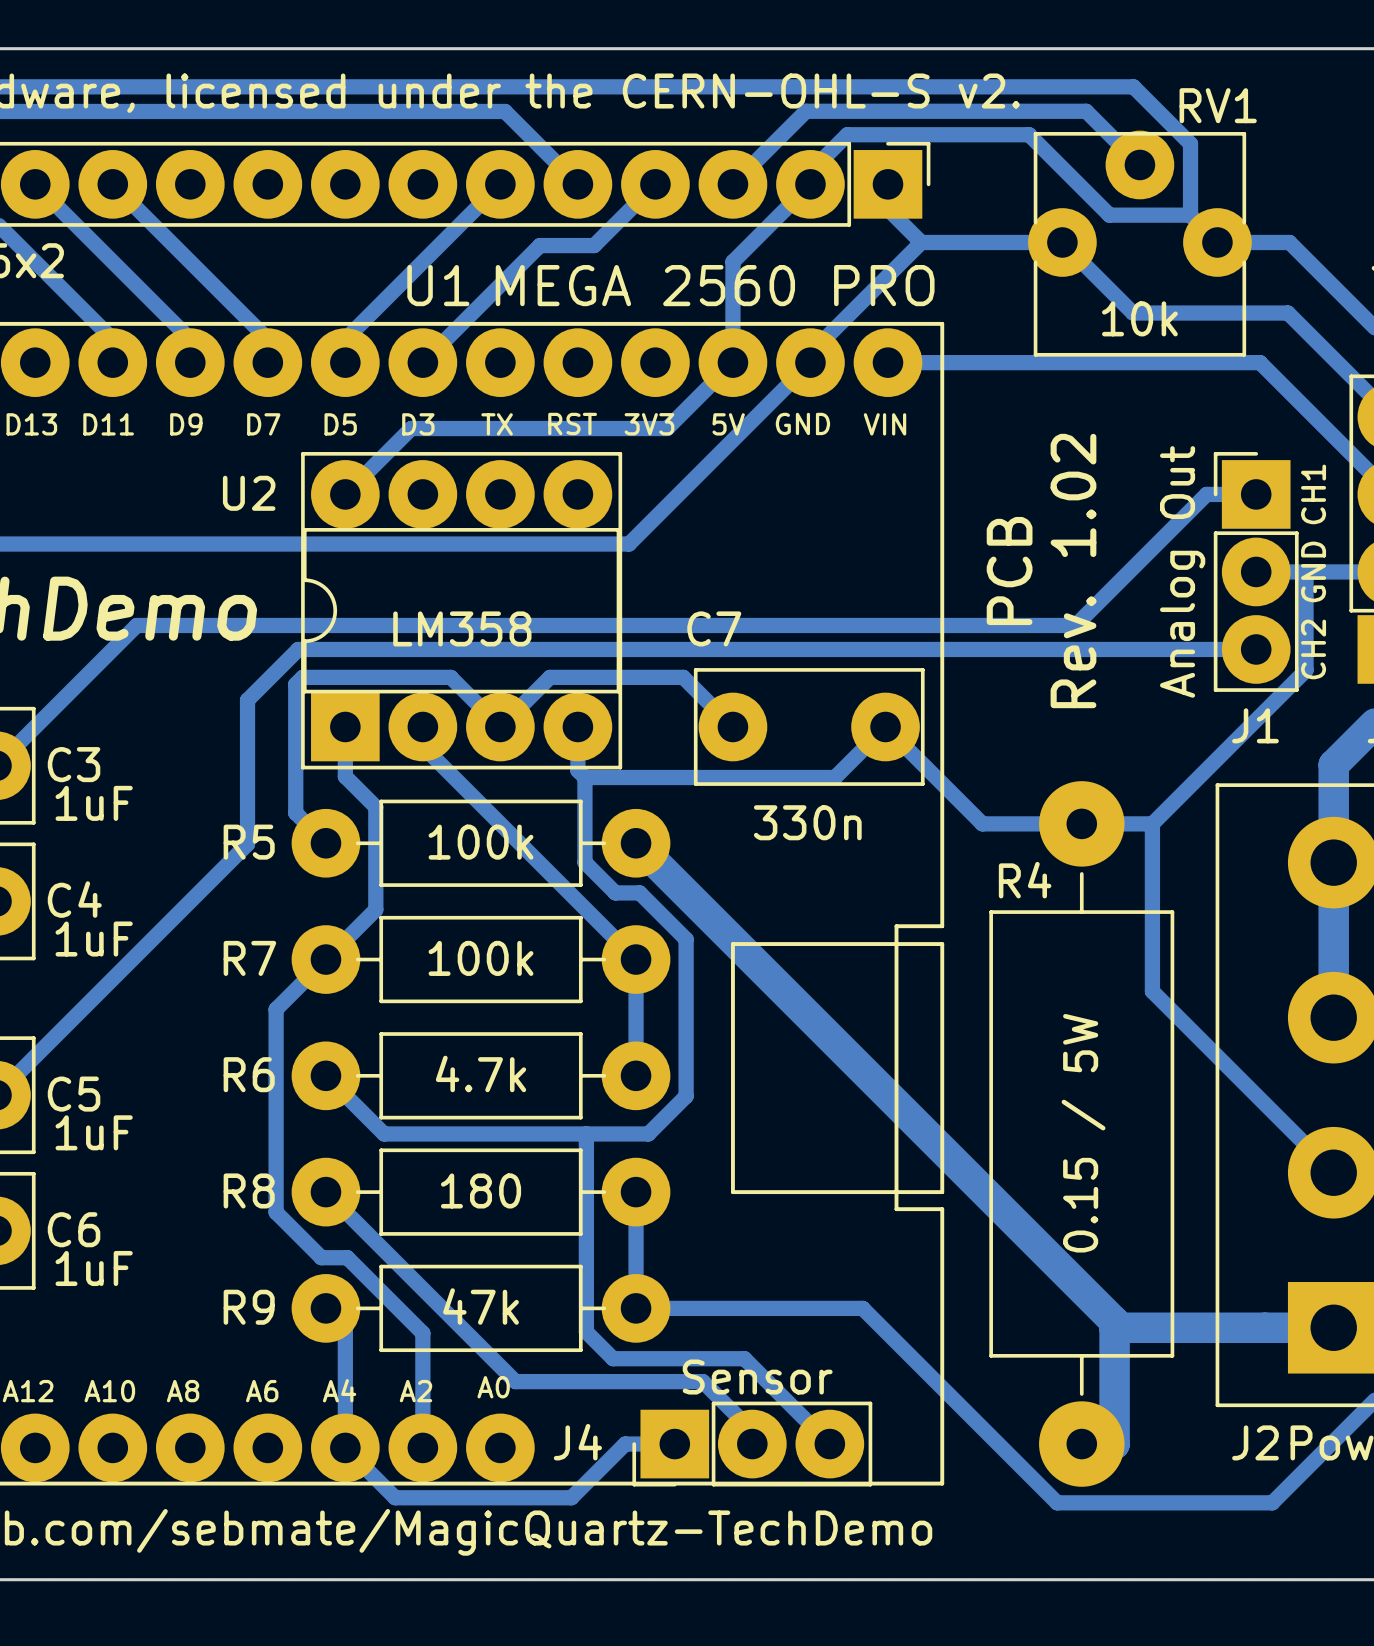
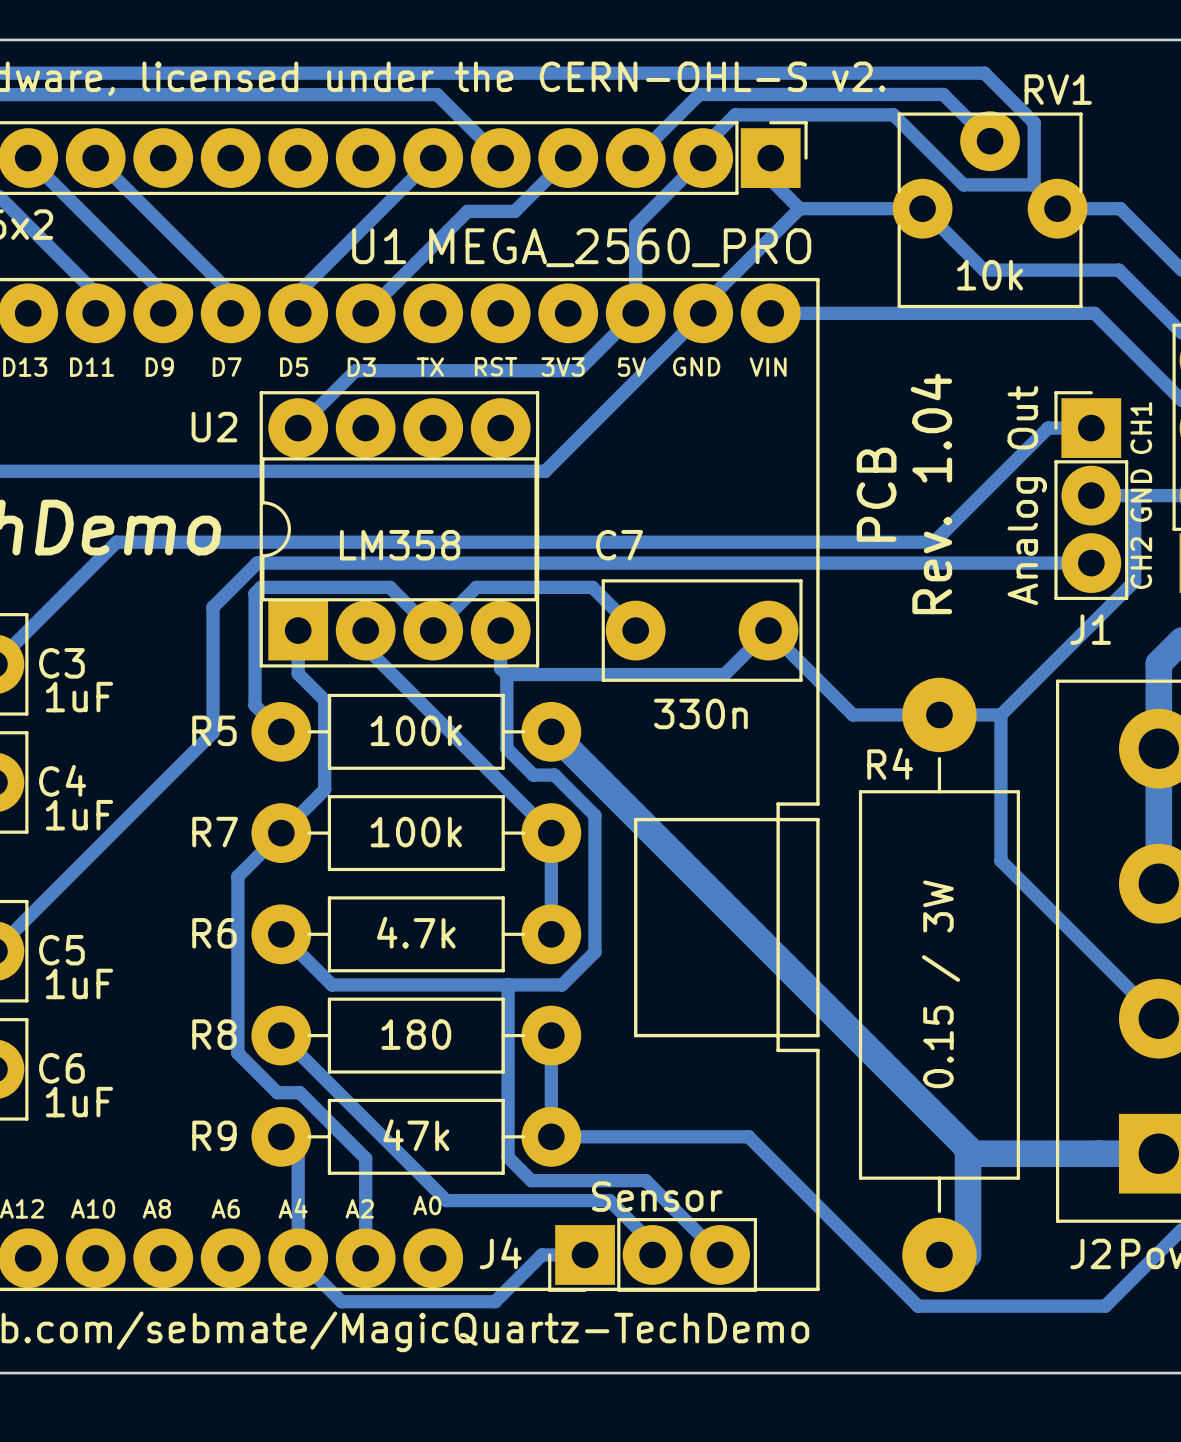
U1 value: MEGA 2560 PRO (715, 285) -> MEGA_2560_PRO (620, 247)
text: Rev. 1.02 (1073, 571) -> Rev. 1.04 (931, 493)
R4 value: 0.15 / 5W (1083, 1133) -> 0.15 / 3W (940, 984)

